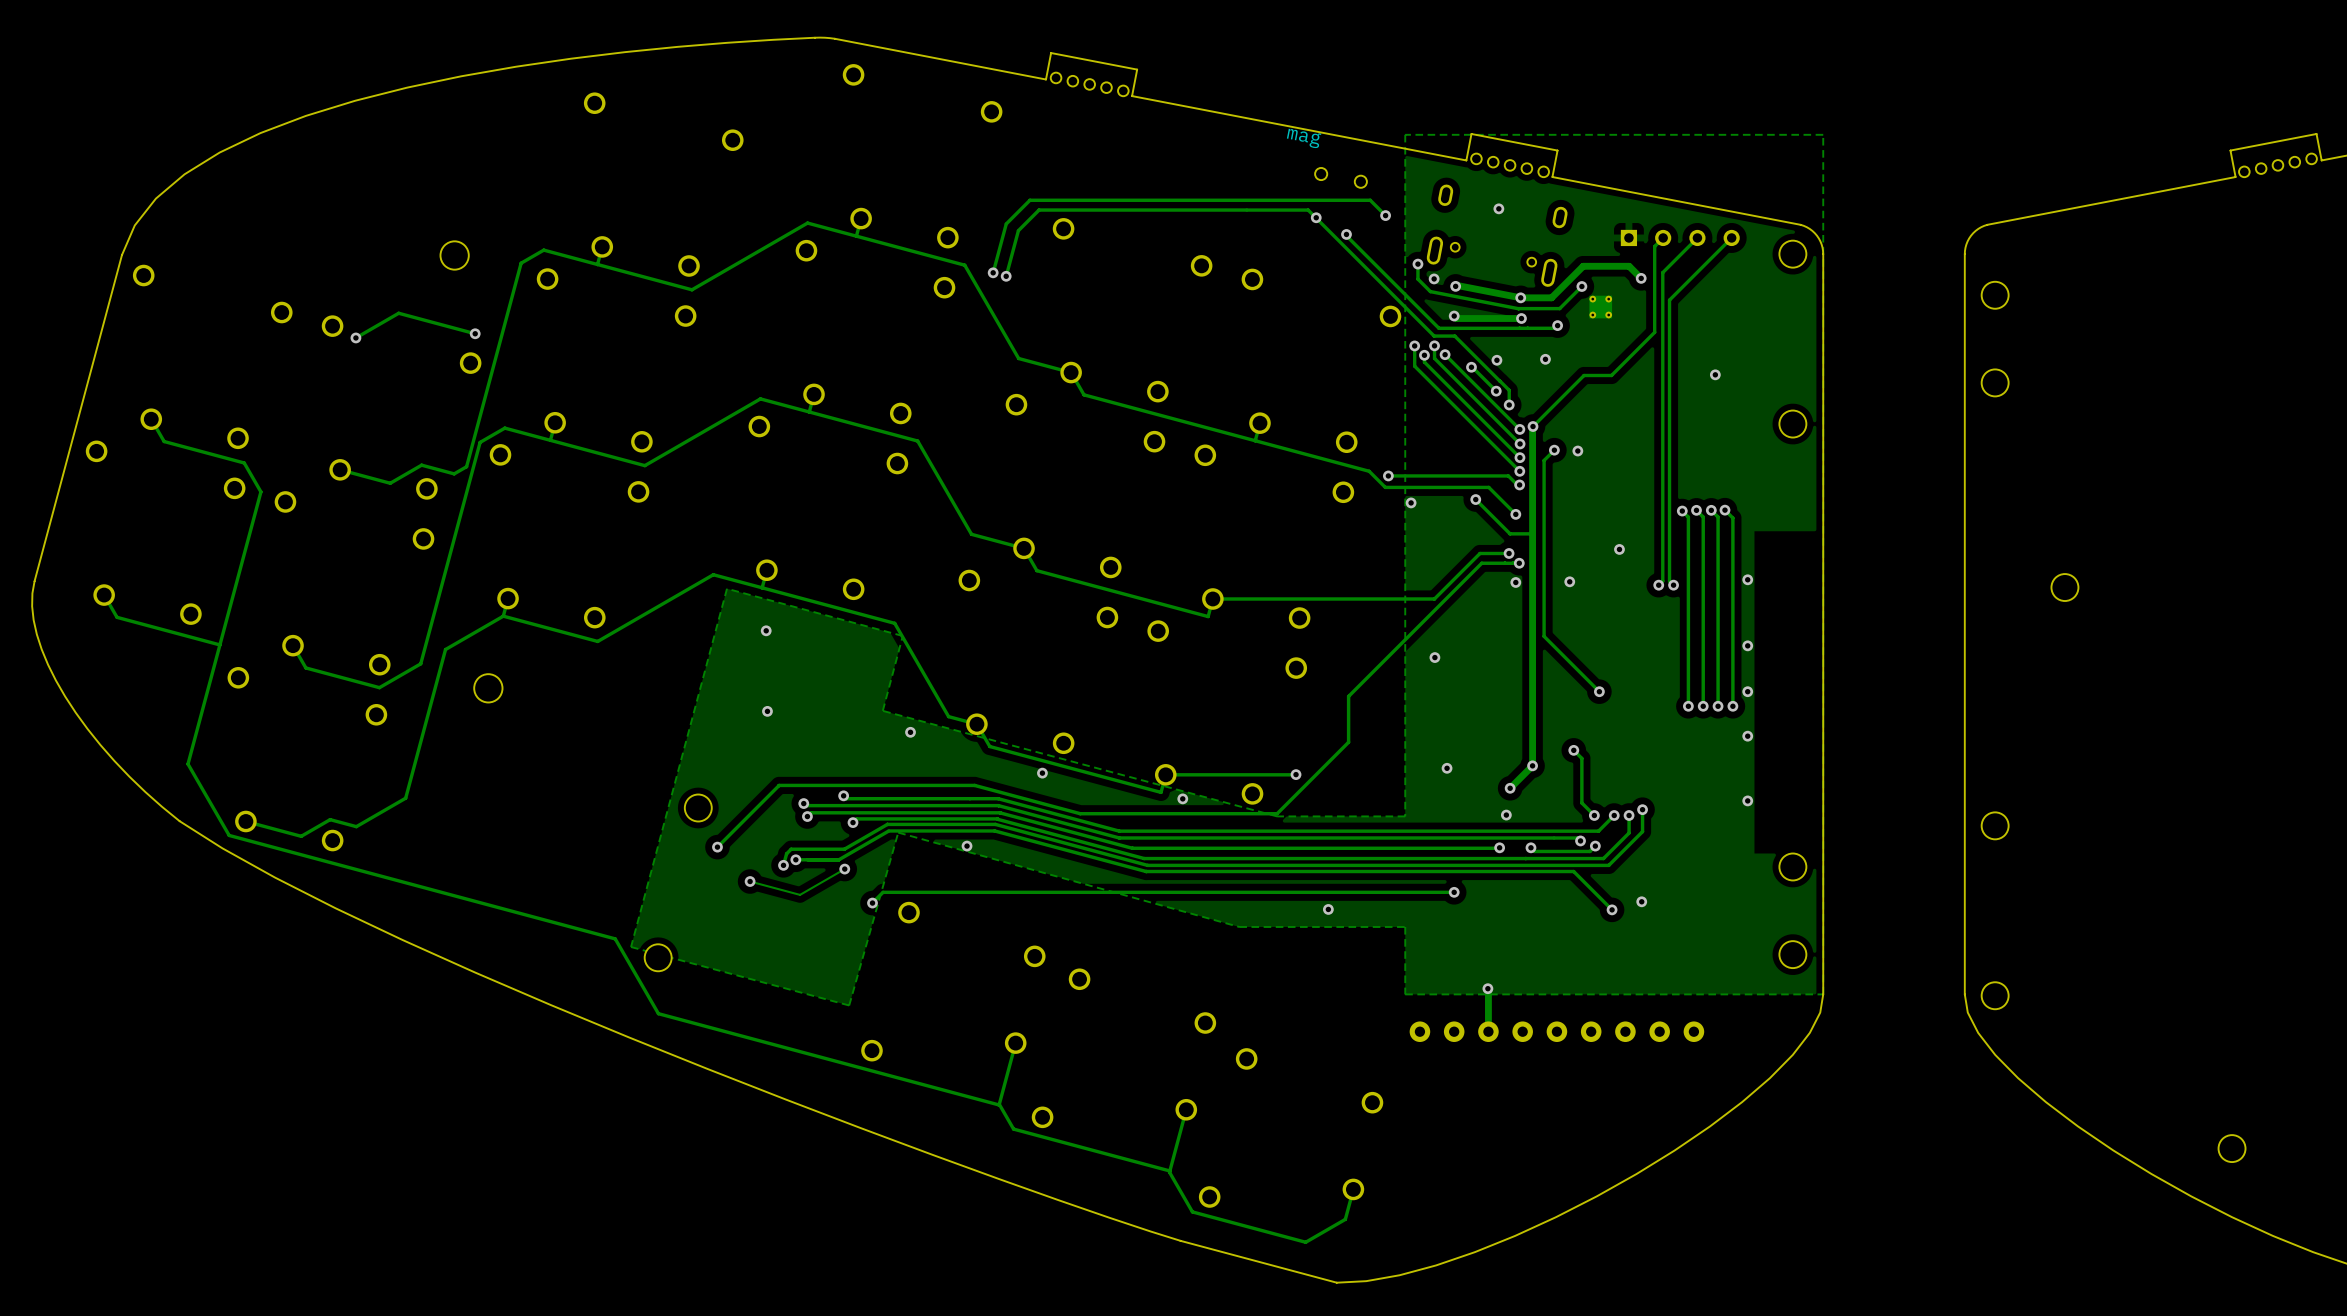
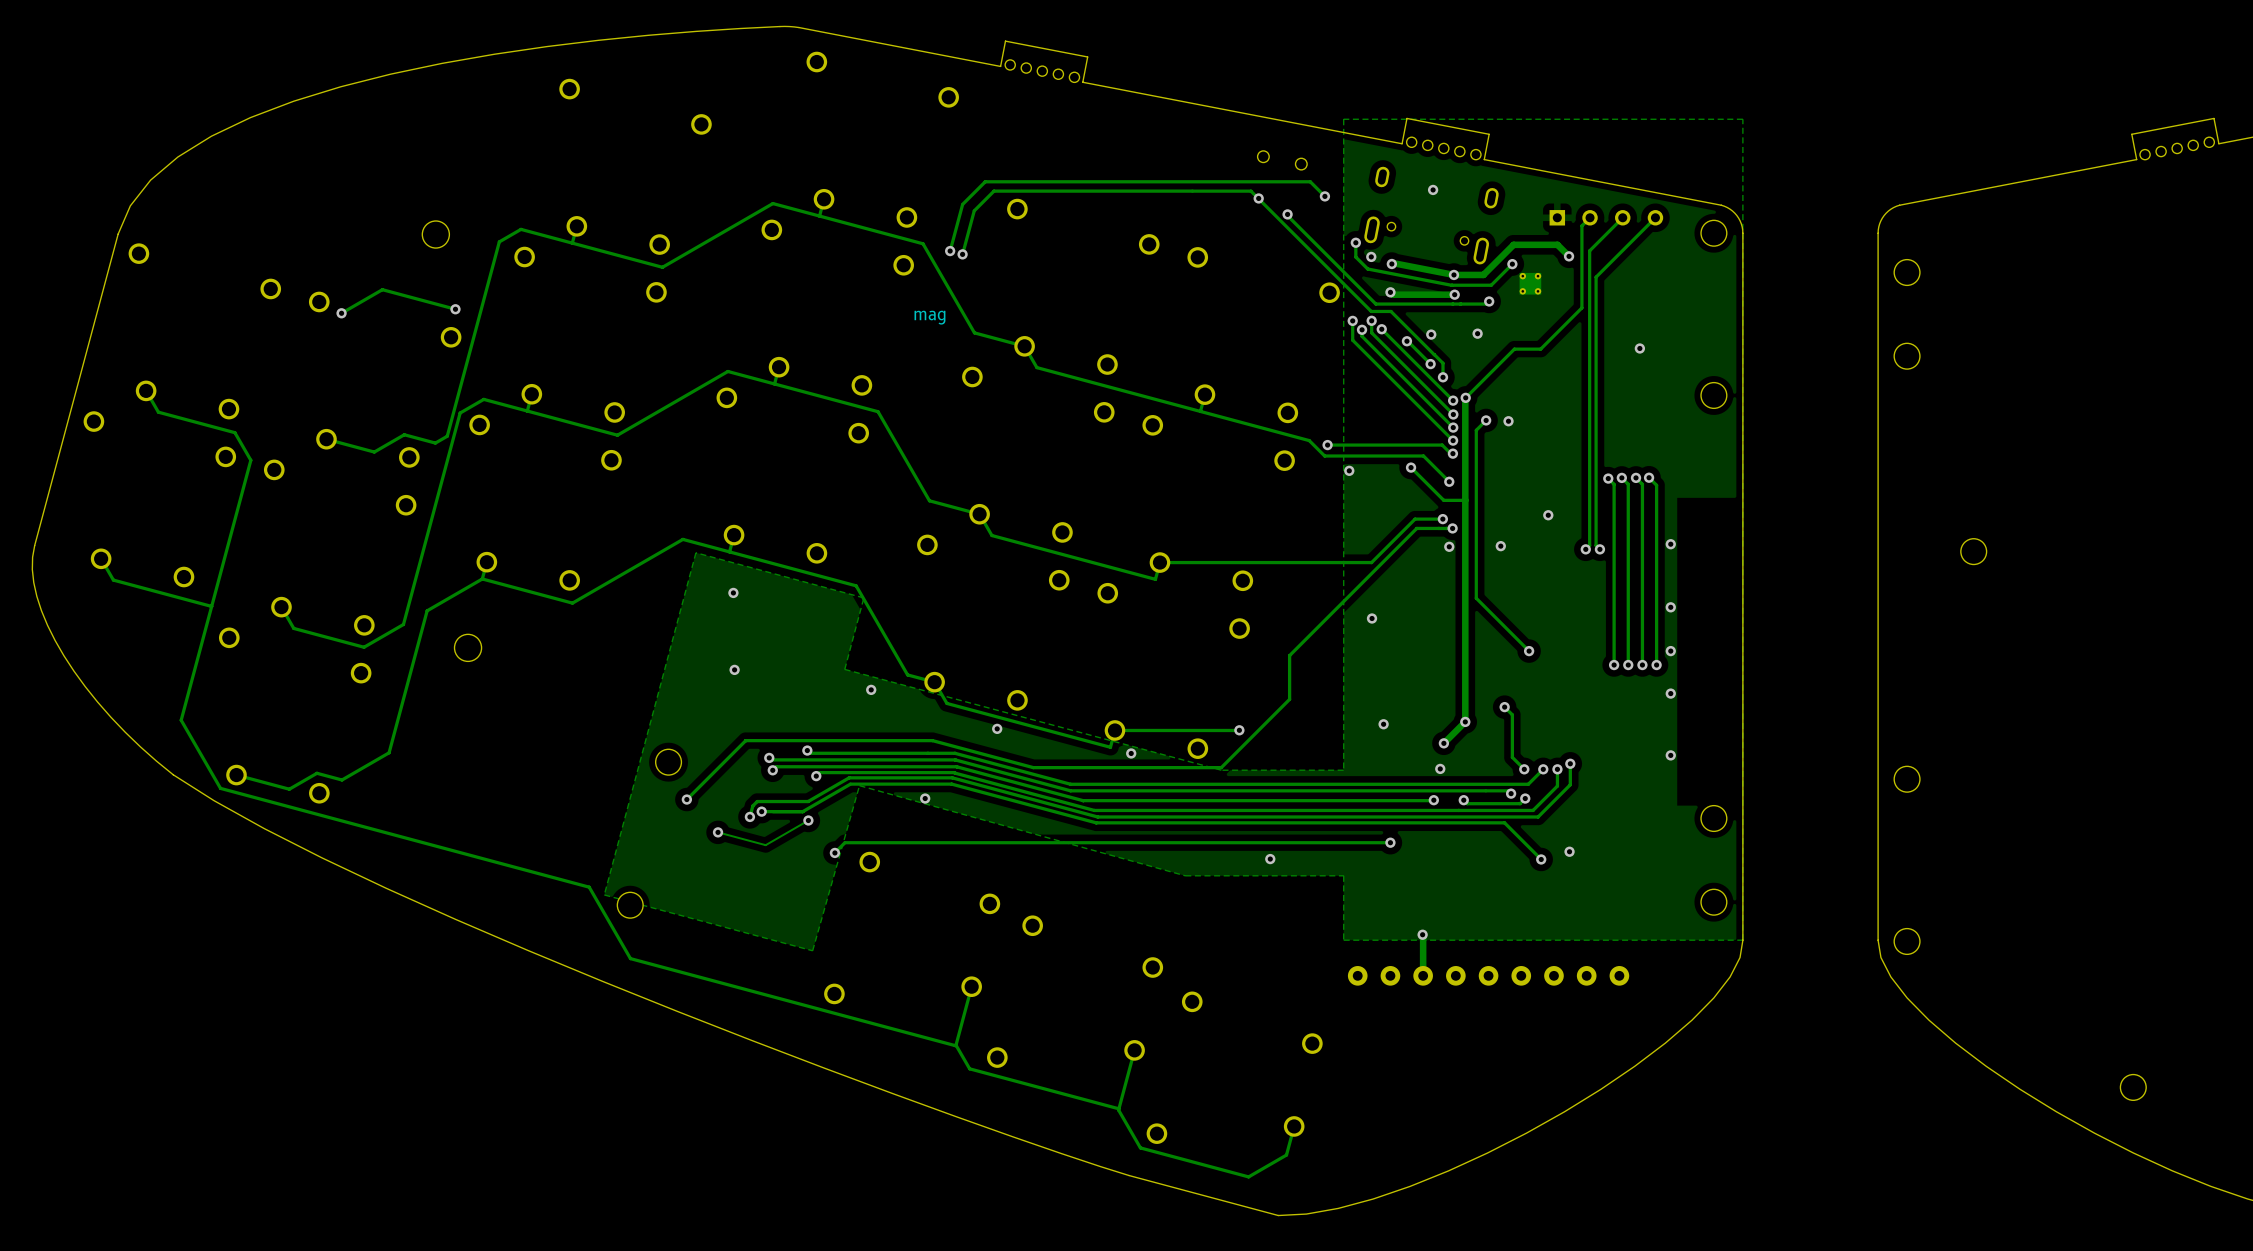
text: mag (1304, 138) -> none
text: none -> mag (929, 317)

